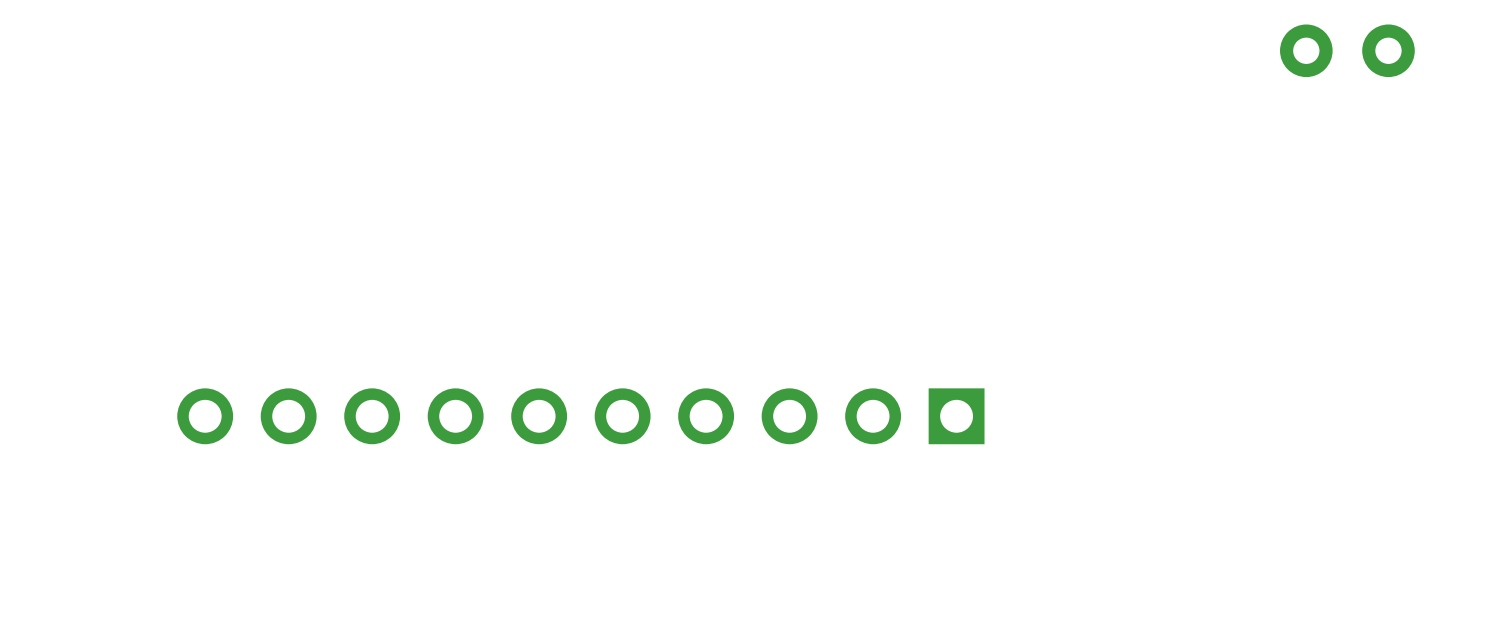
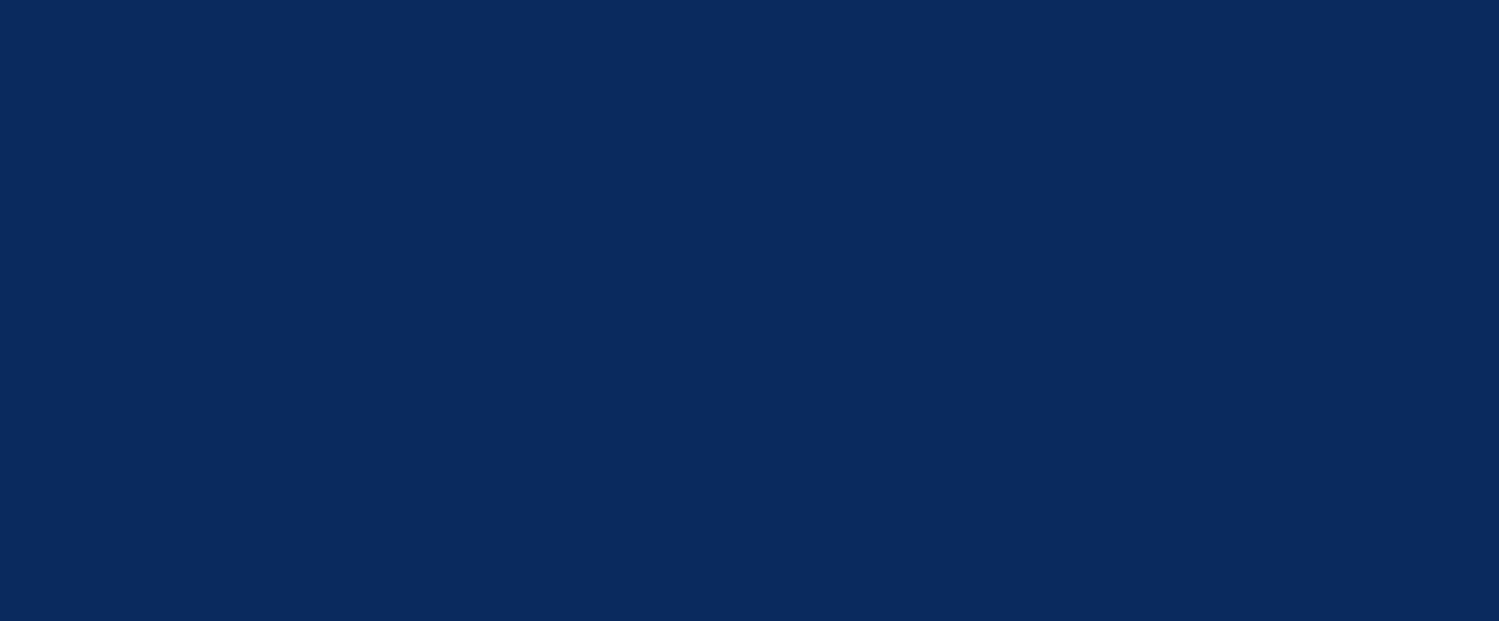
part: (1347, 50) -> none
part: (580, 416) -> none

